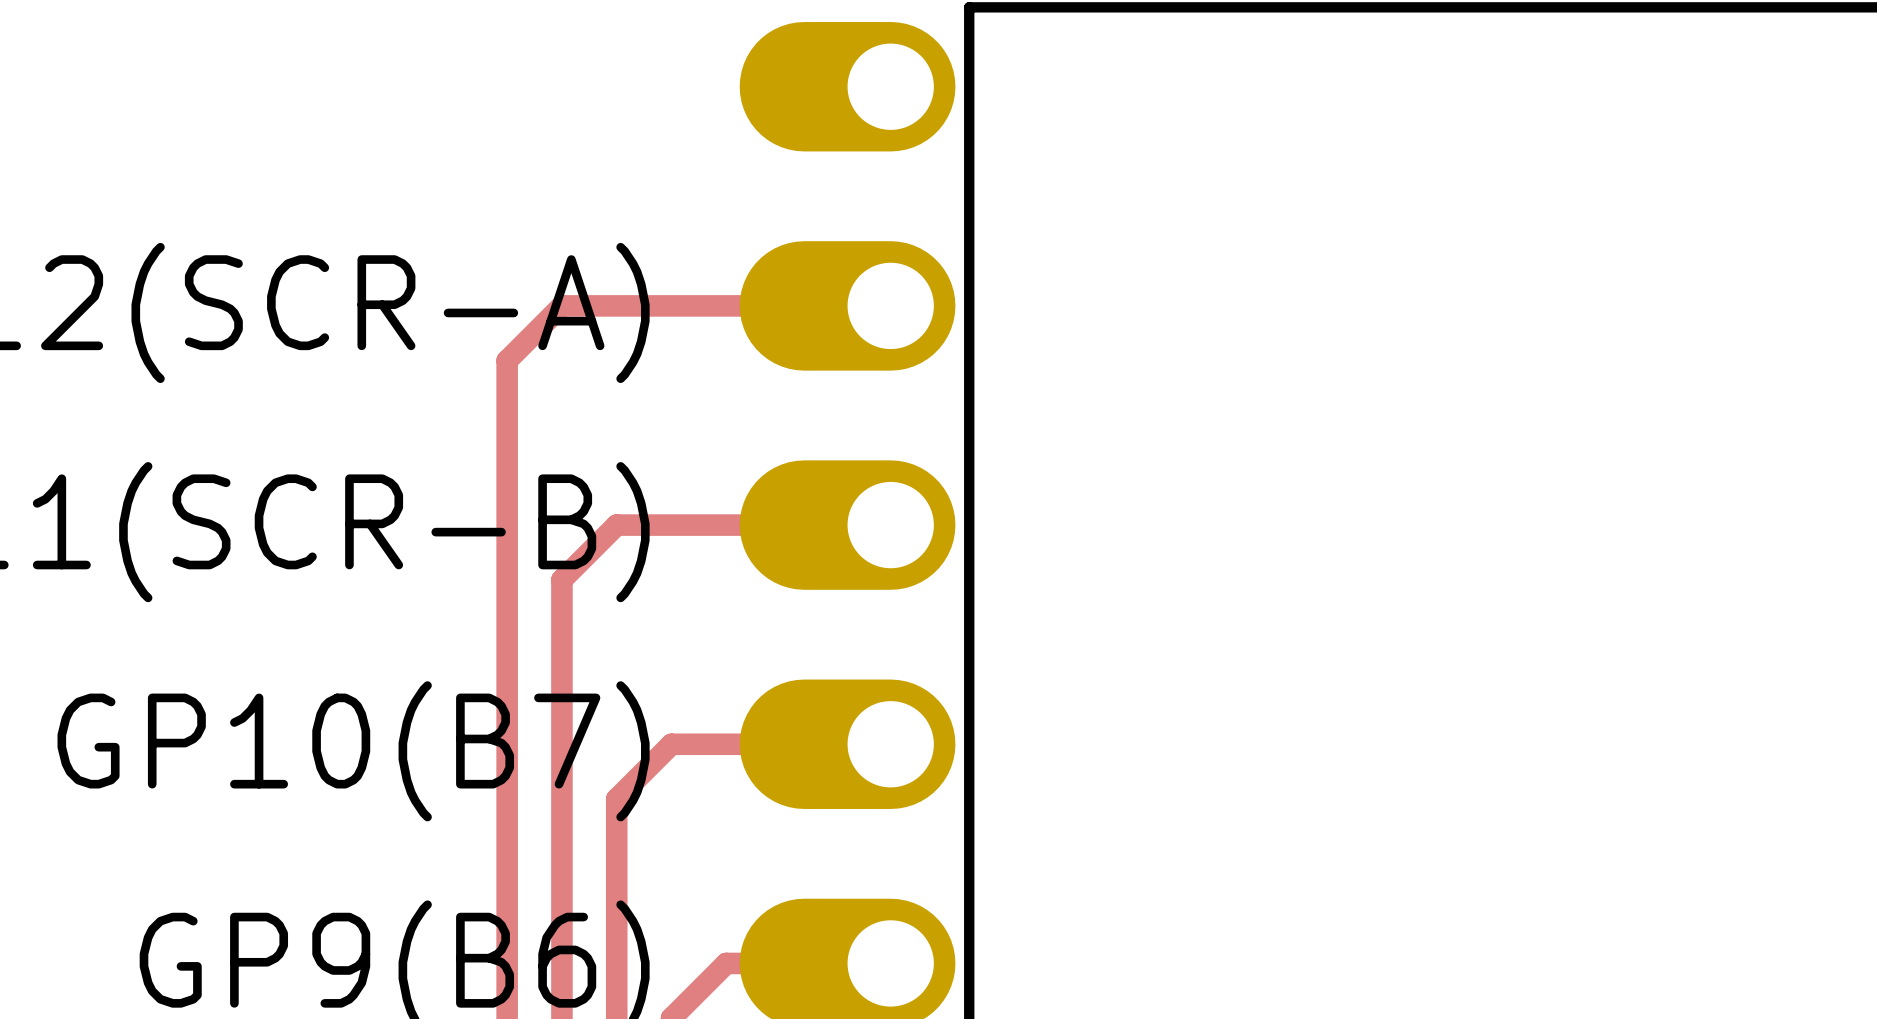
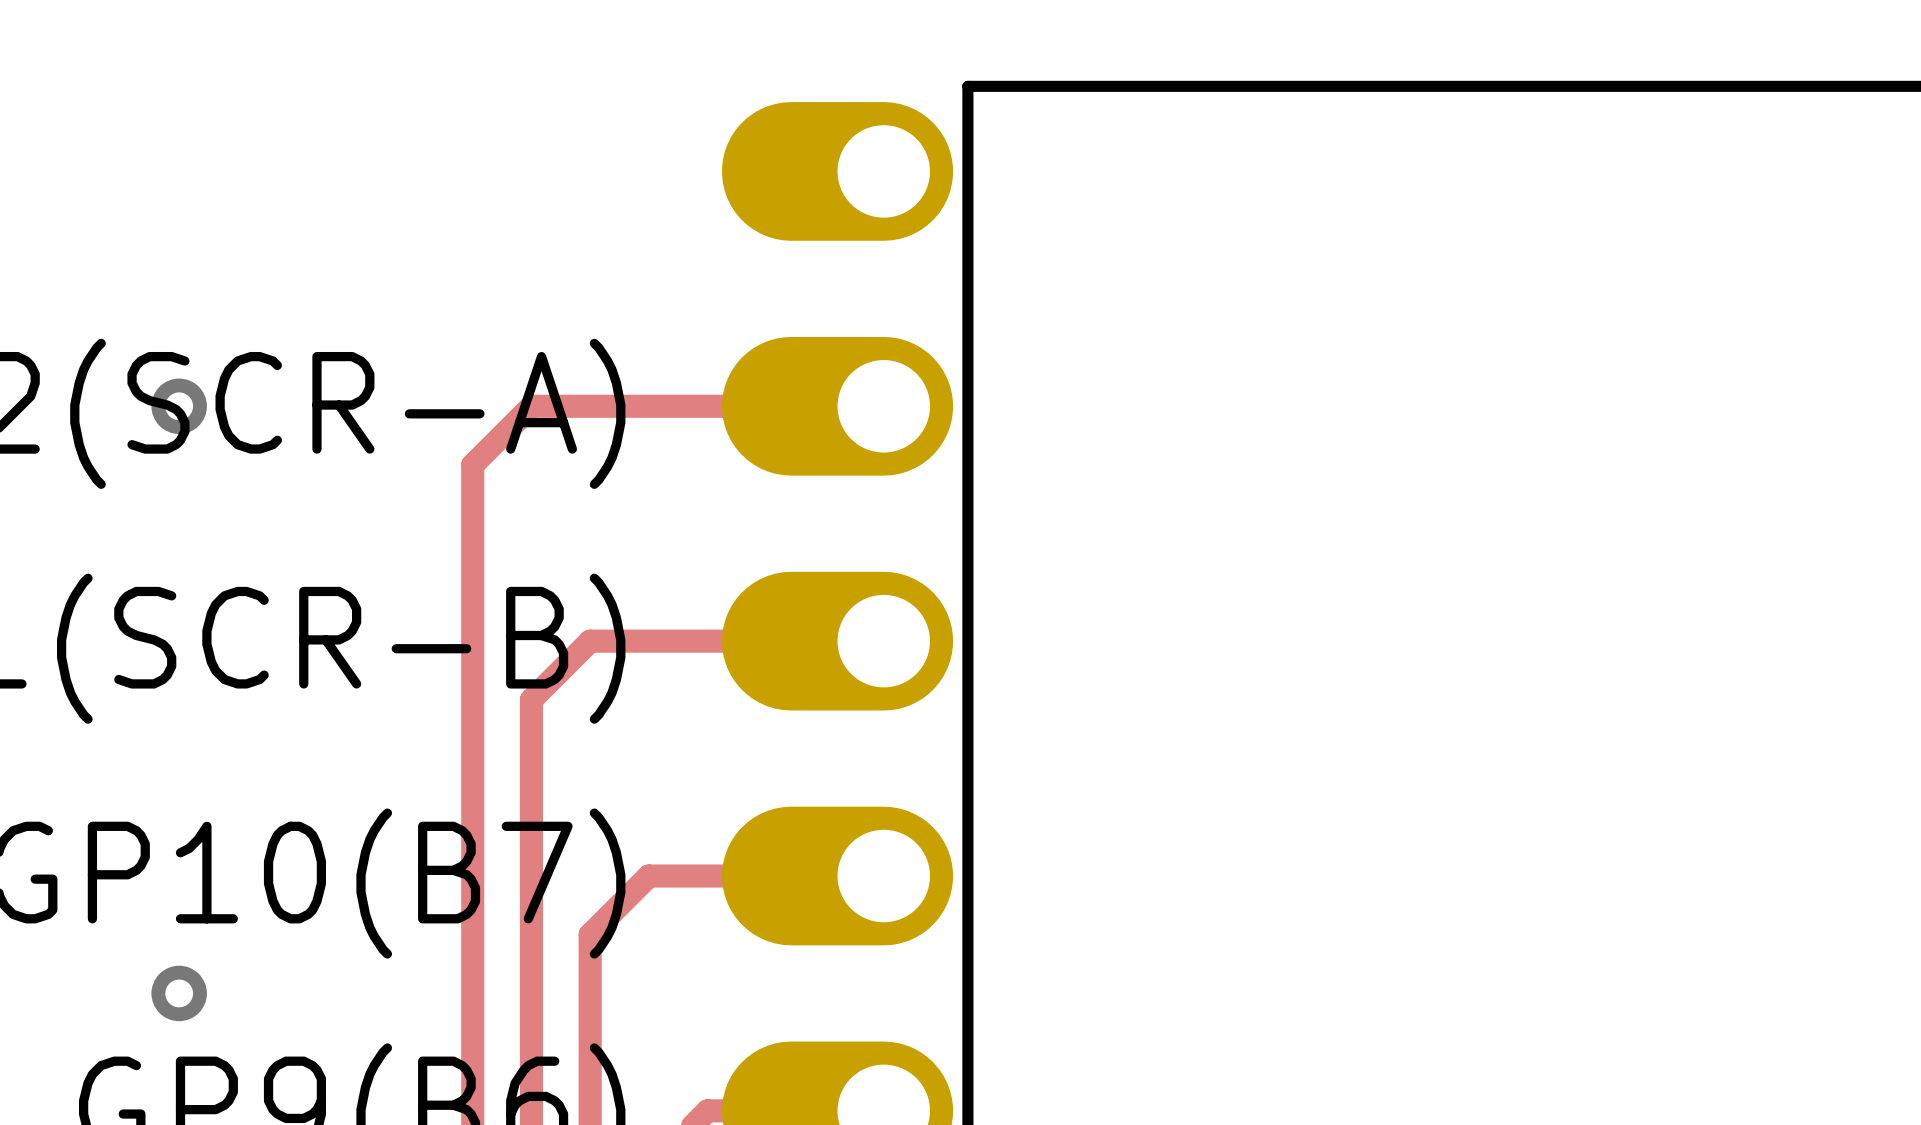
via: none -> (179, 406)
via: none -> (179, 993)

